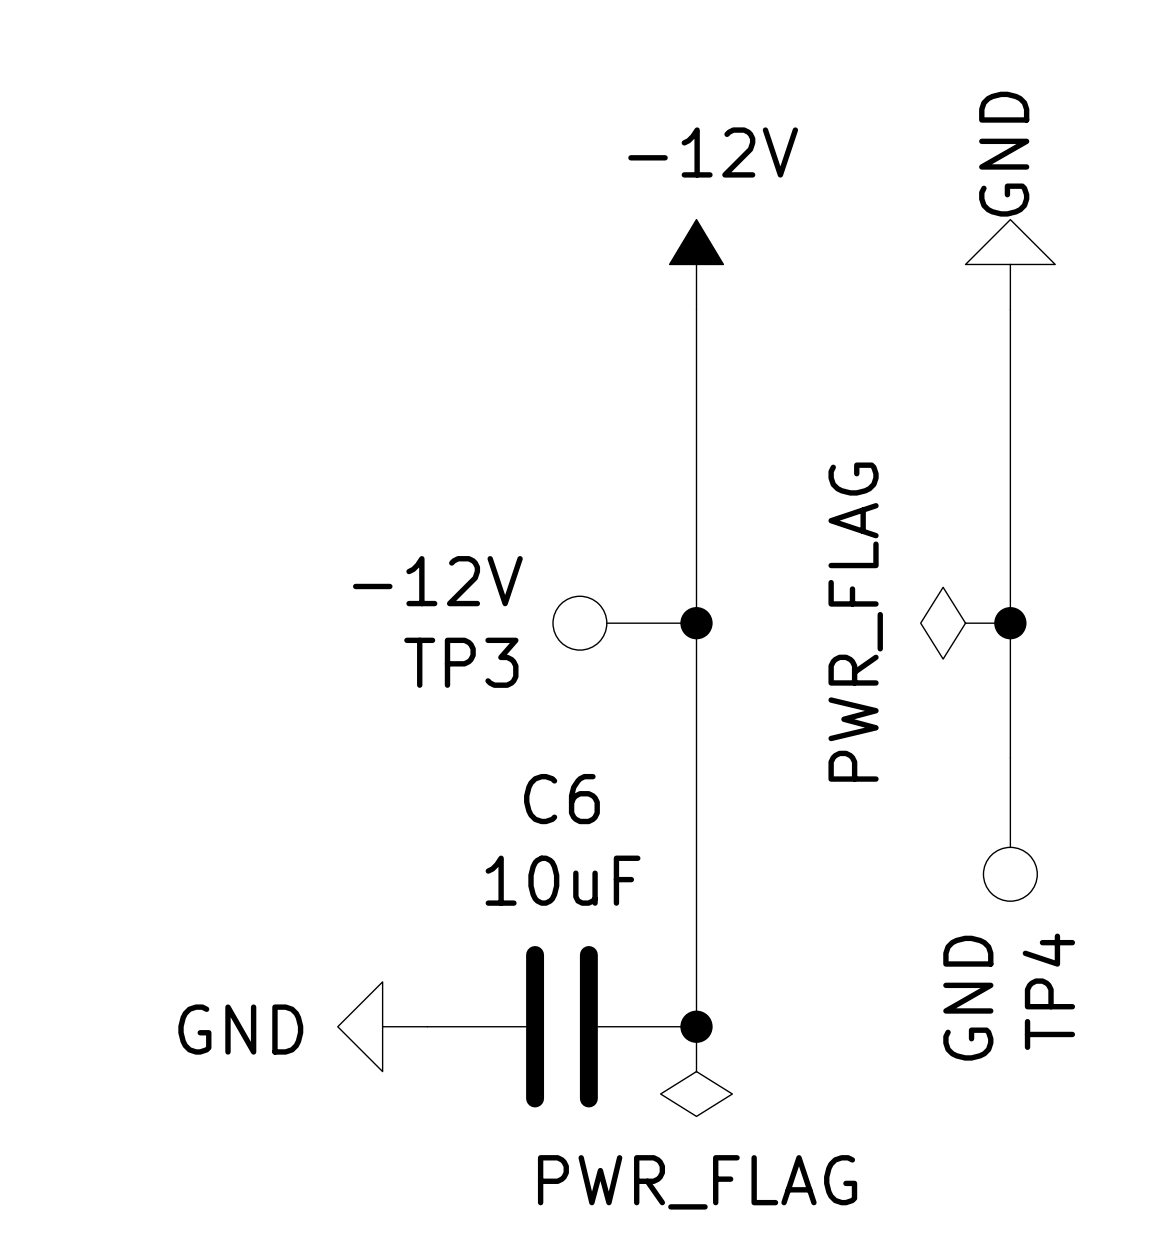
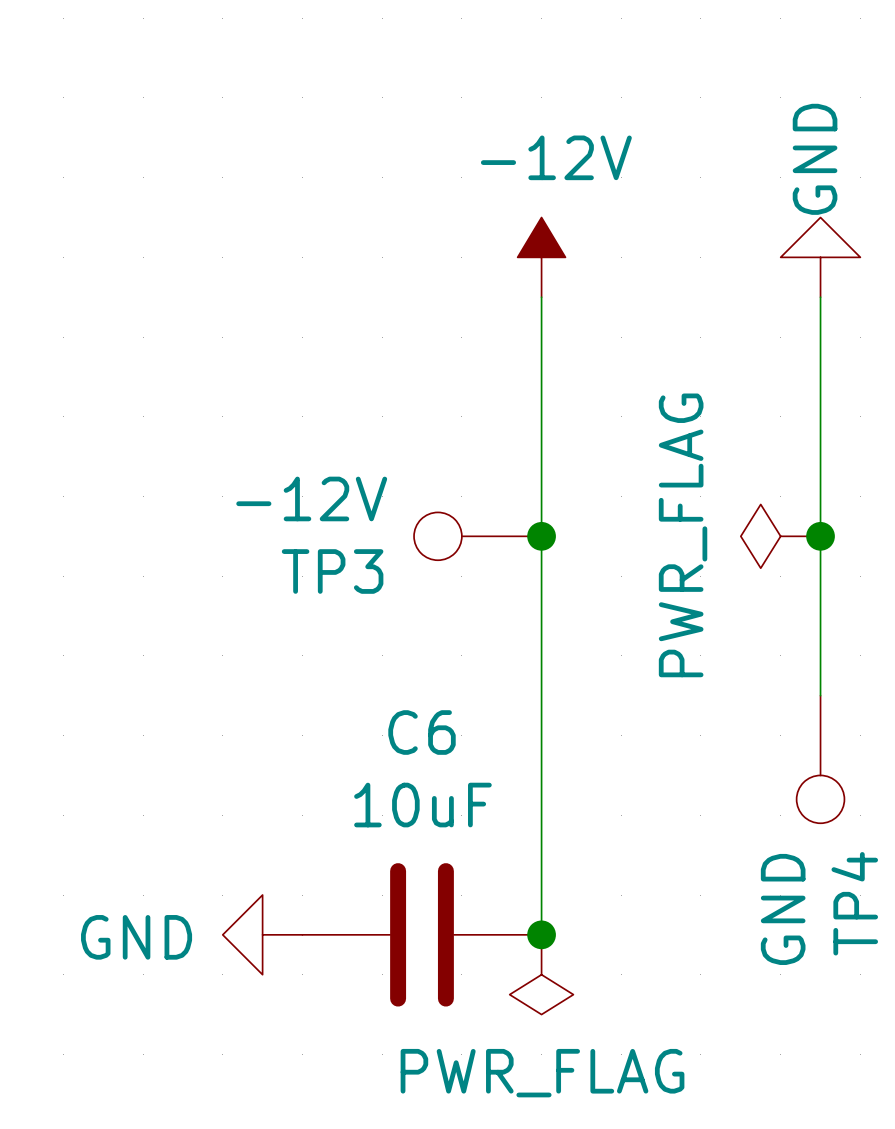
TP3 position: (624, 623) -> (477, 536)
junction position: (696, 623) -> (541, 536)
power symbol position: PWR_FLAG (965, 623) -> PWR_FLAG (780, 536)
junction position: (1010, 623) -> (820, 536)

